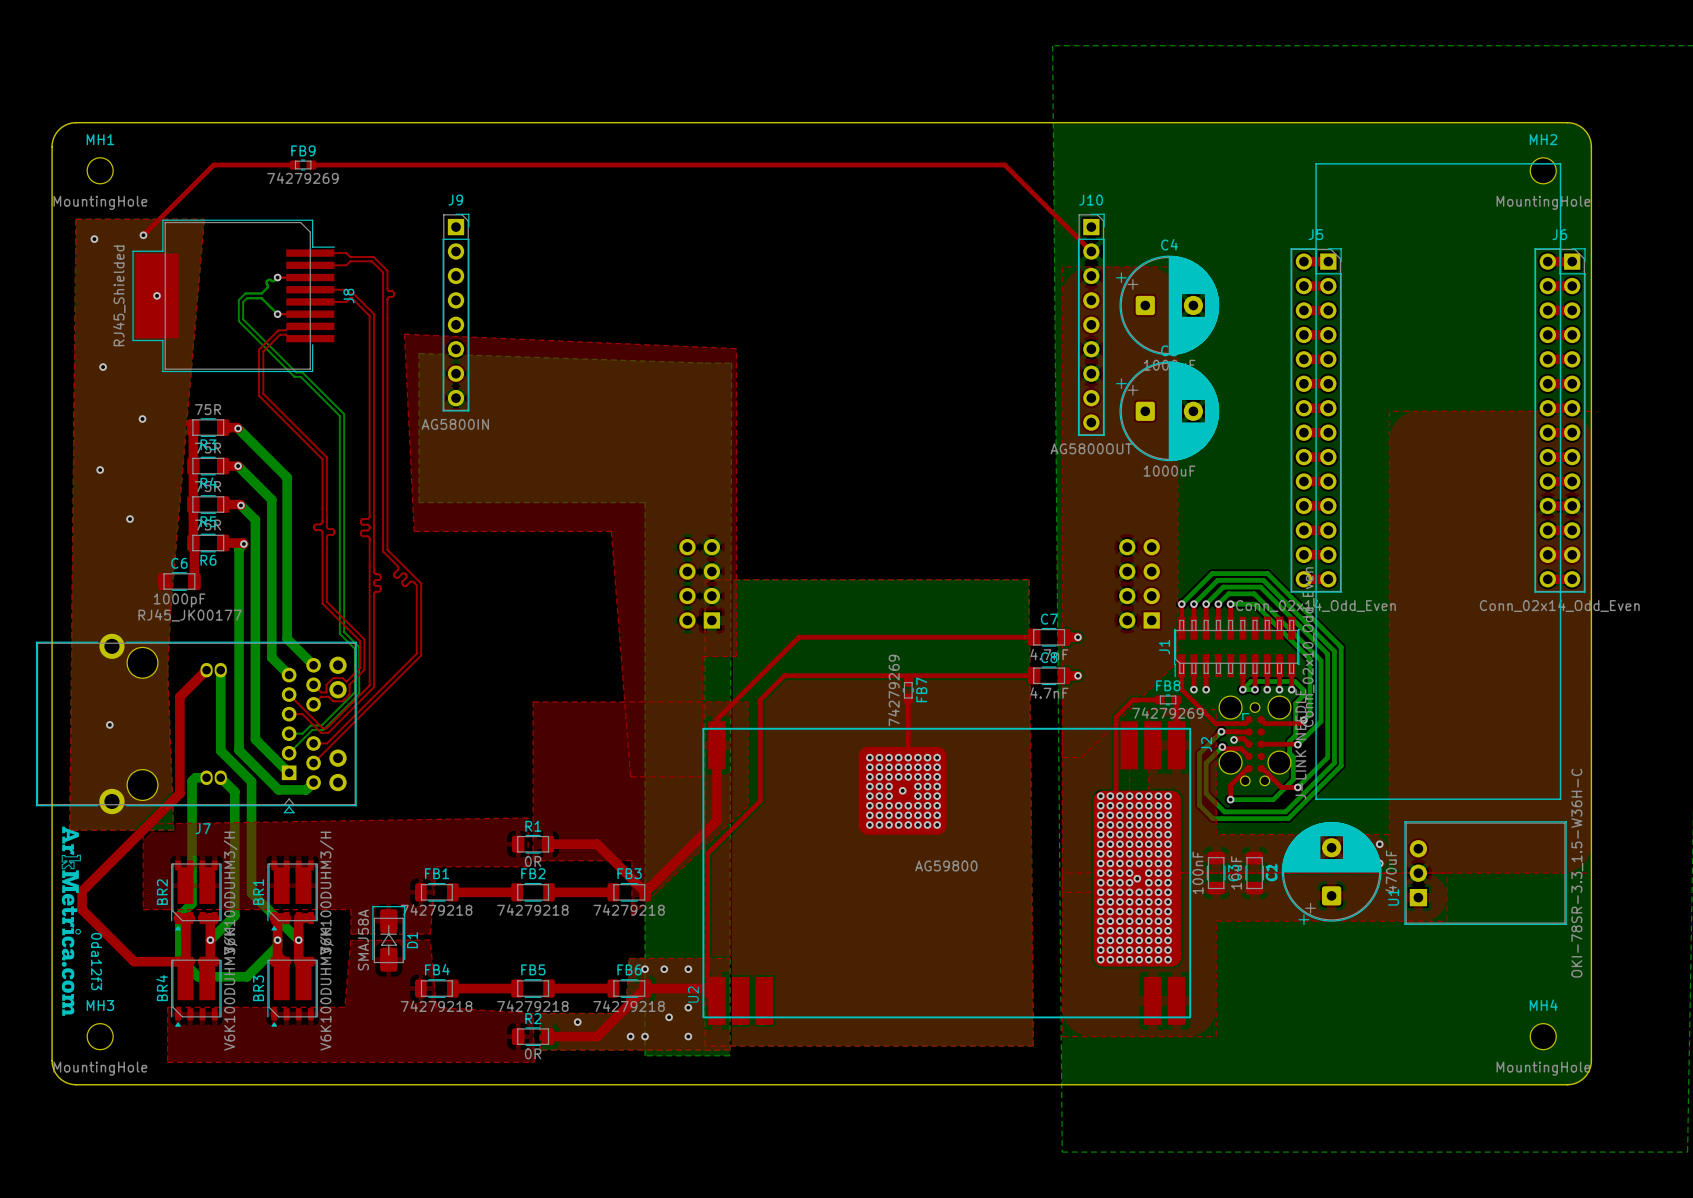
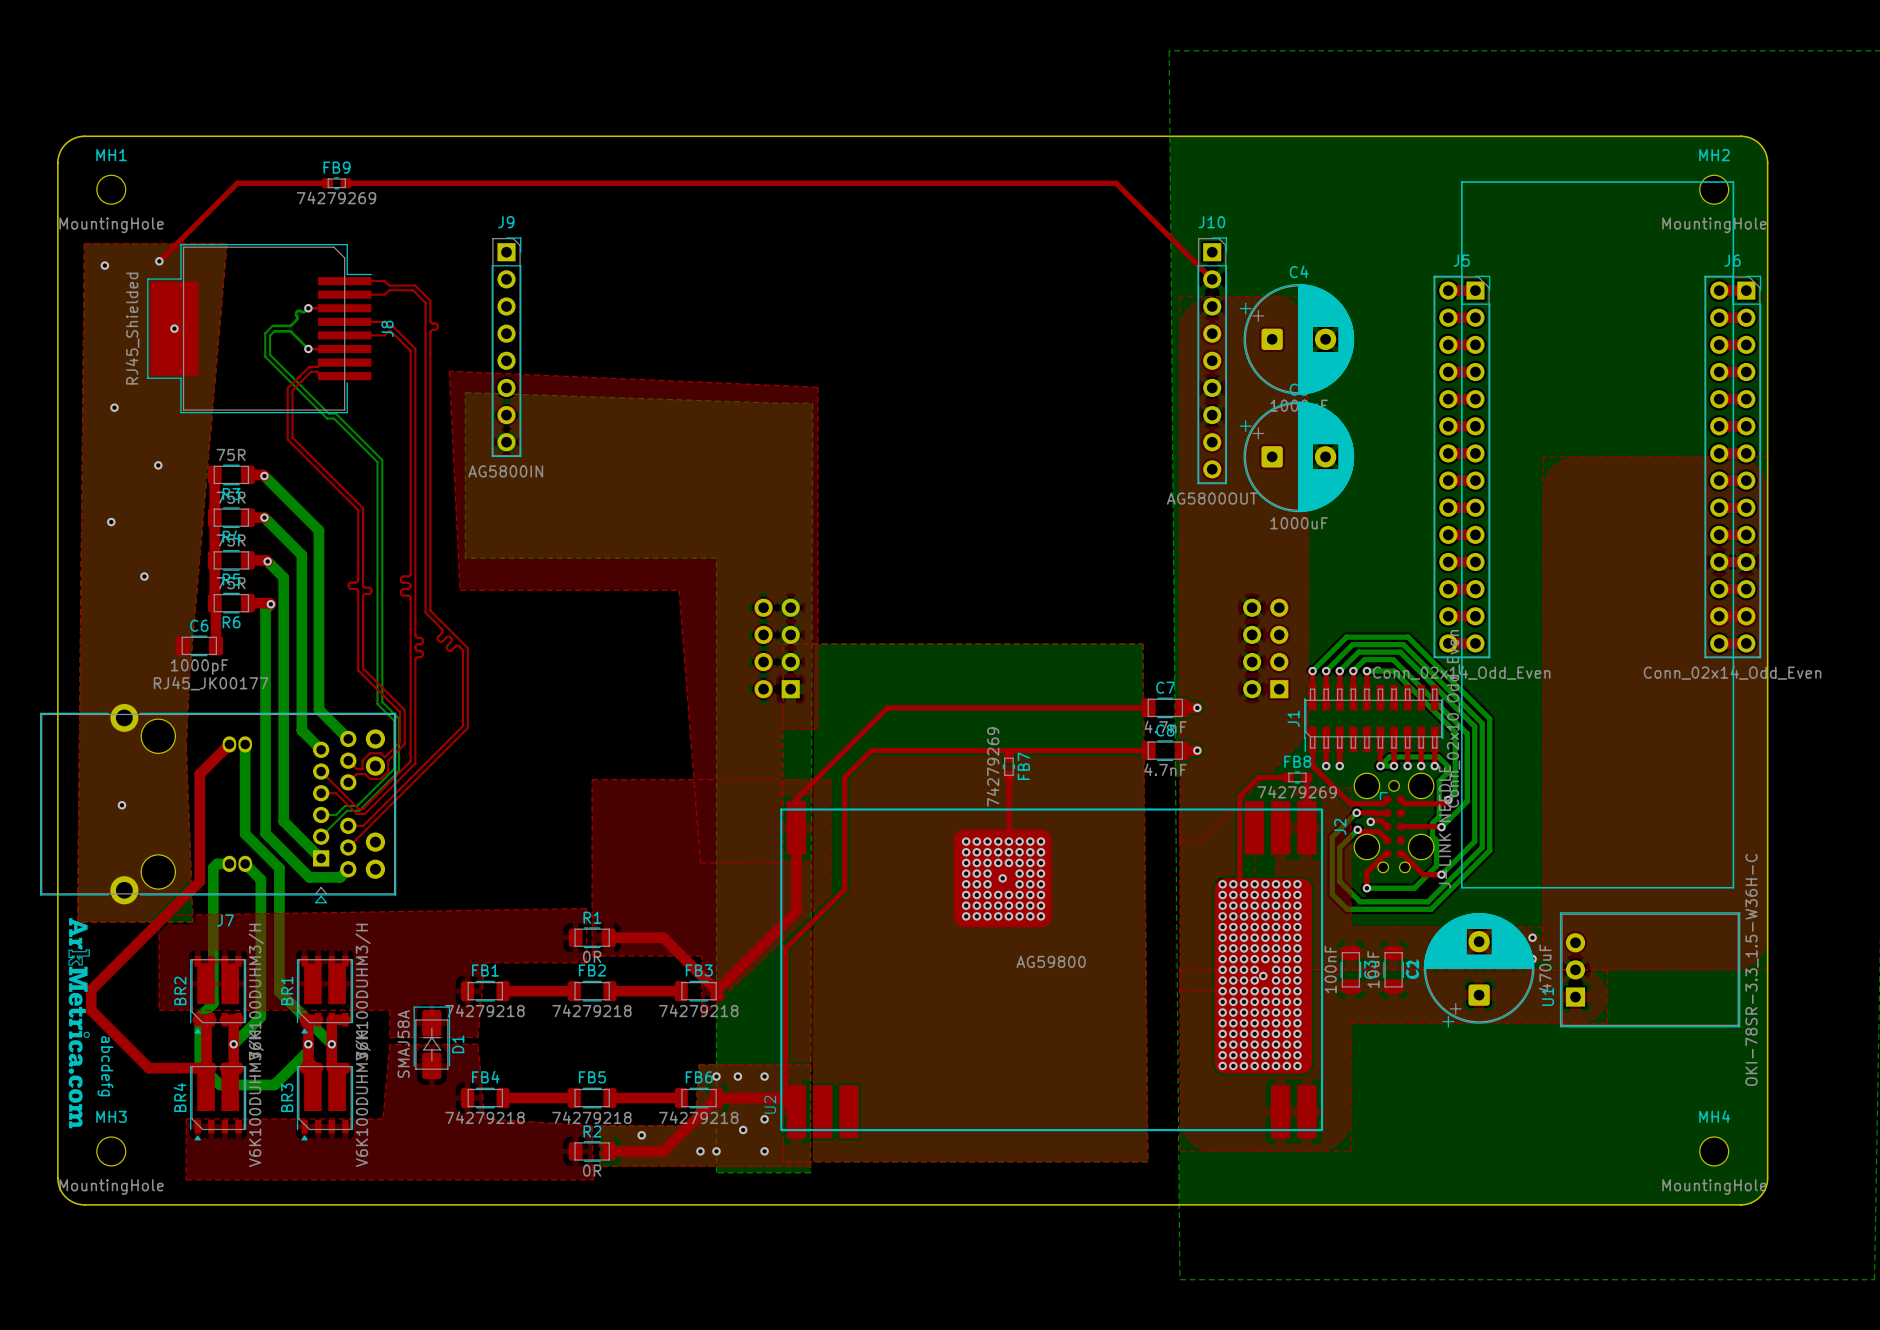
text: 0da12f3 (96, 961) -> abcdefg (105, 1066)

